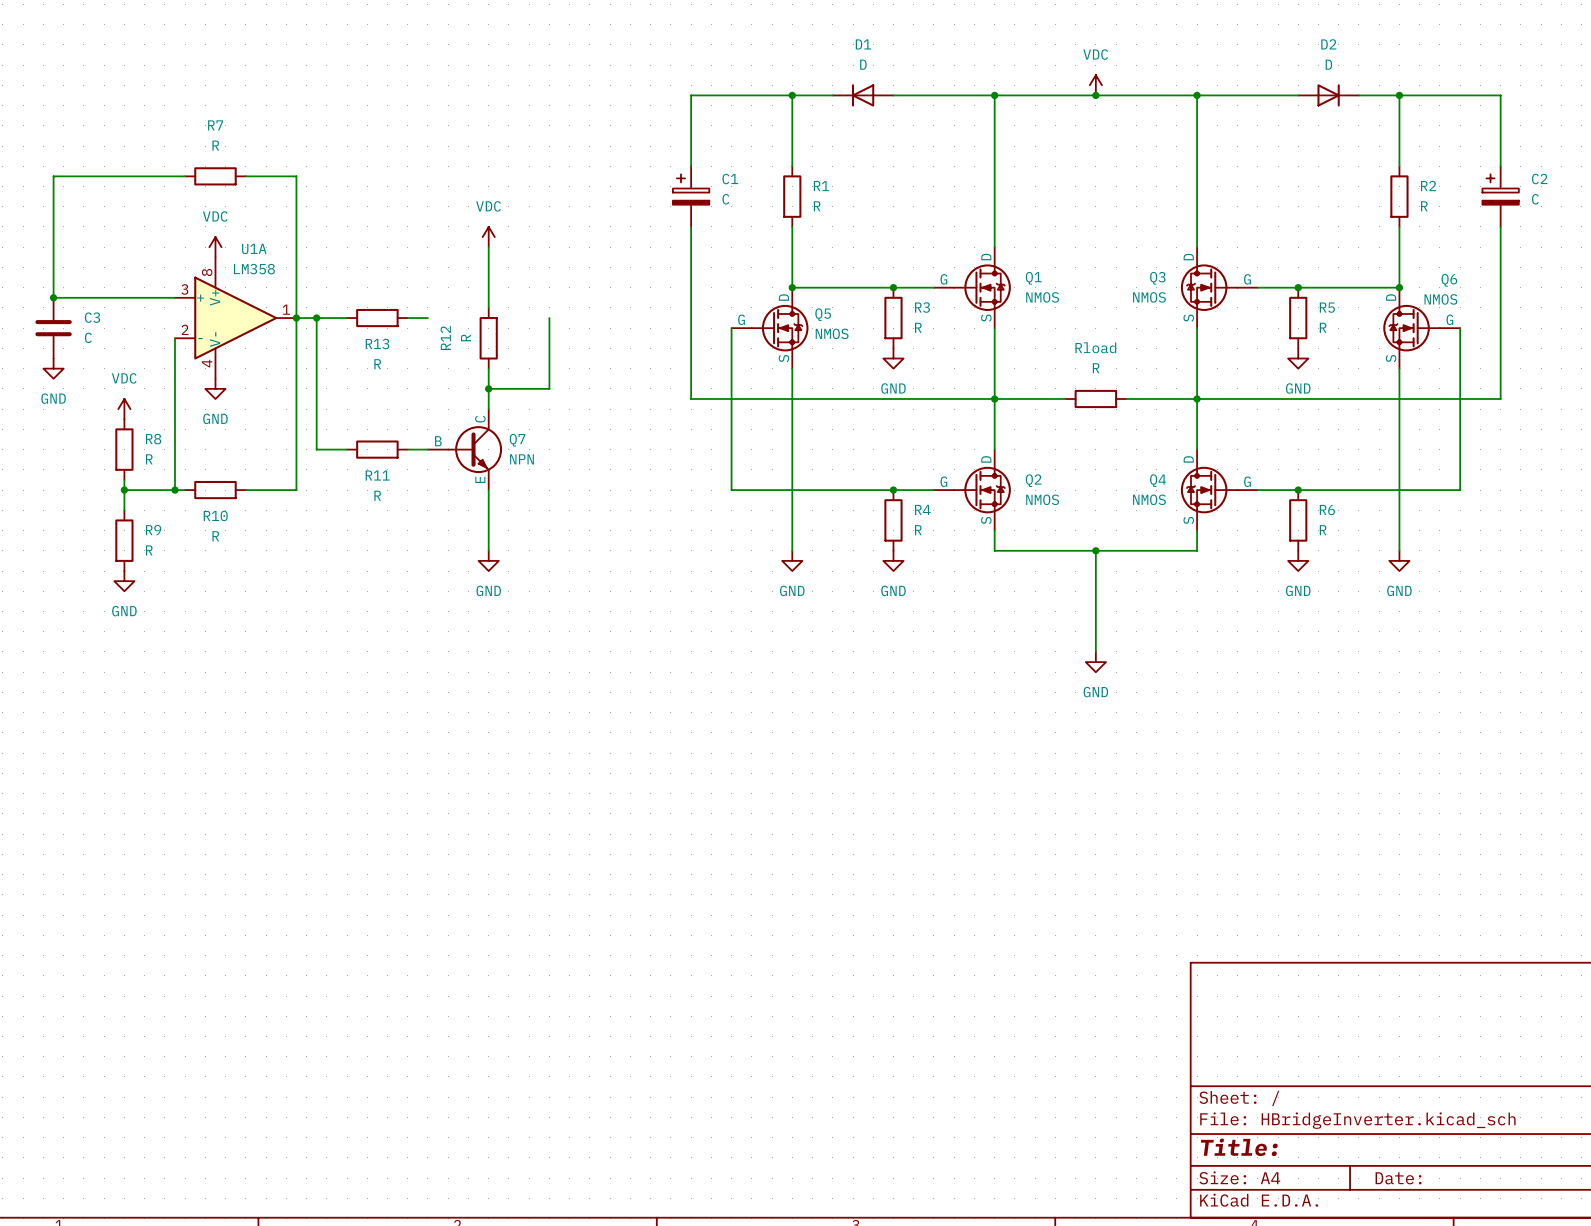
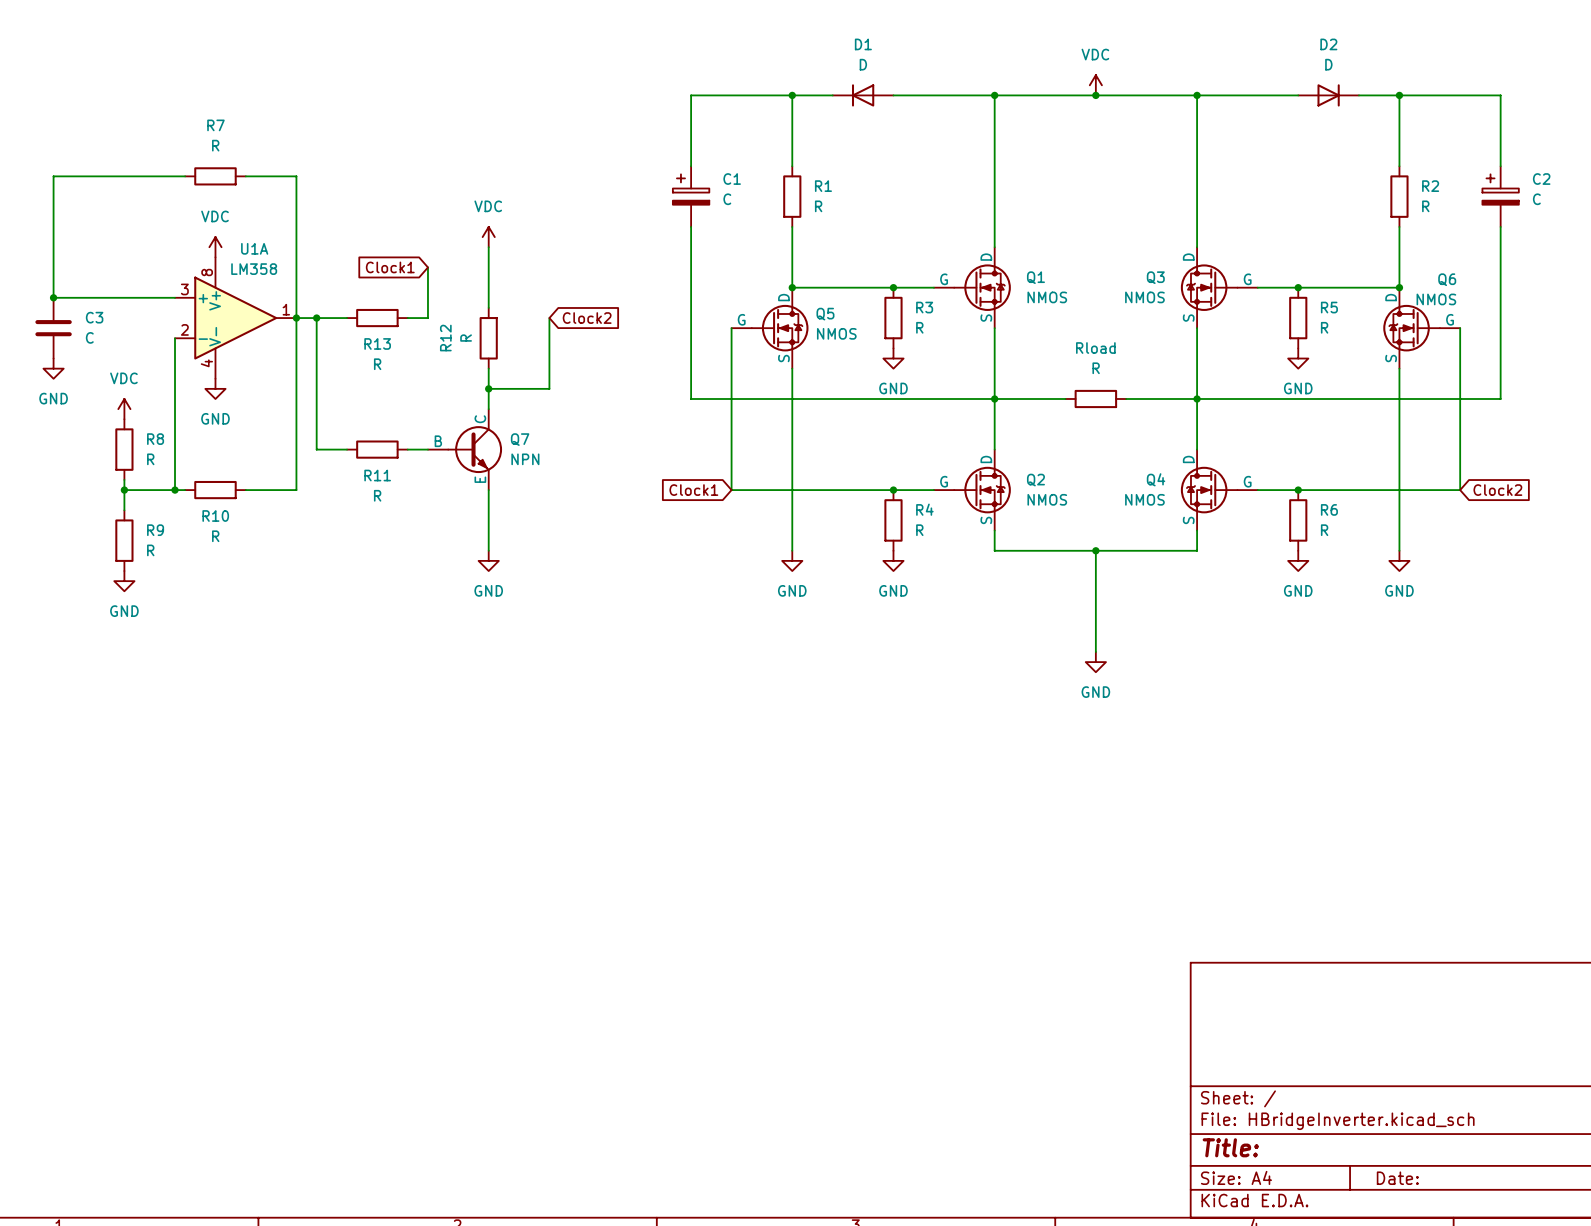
global label: none -> Clock1 (390, 267)
wire: none -> (427, 267) (427, 318)
global label: none -> Clock2 (587, 318)
global label: none -> Clock1 (693, 490)
global label: none -> Clock2 (1497, 490)

